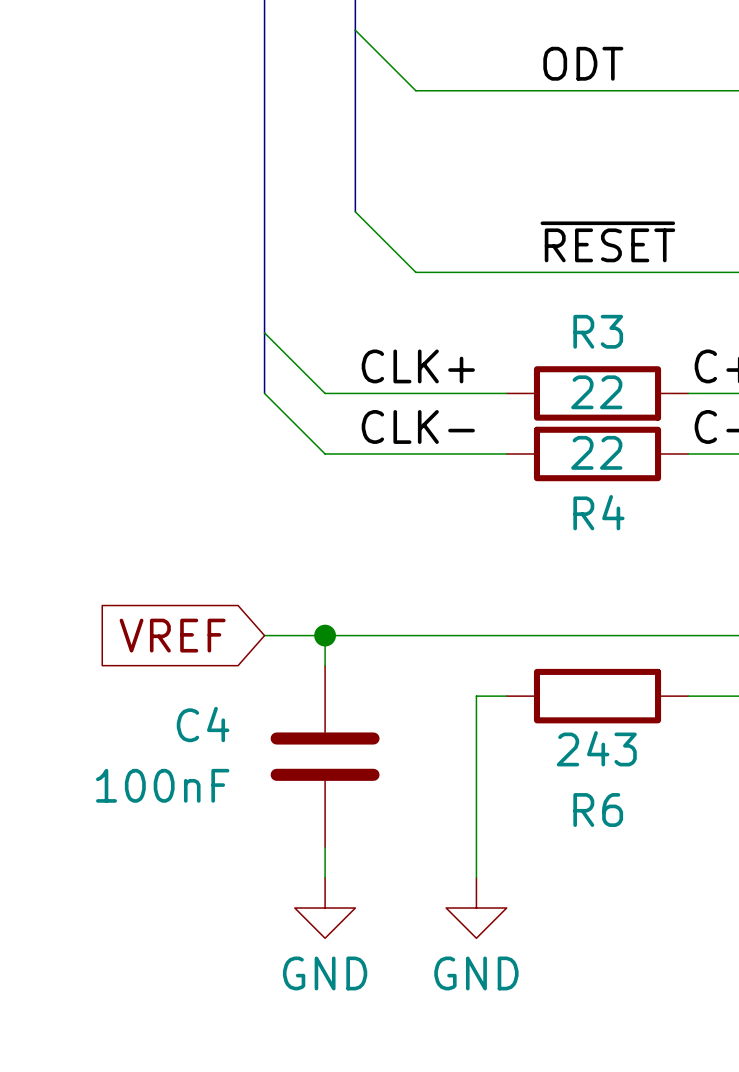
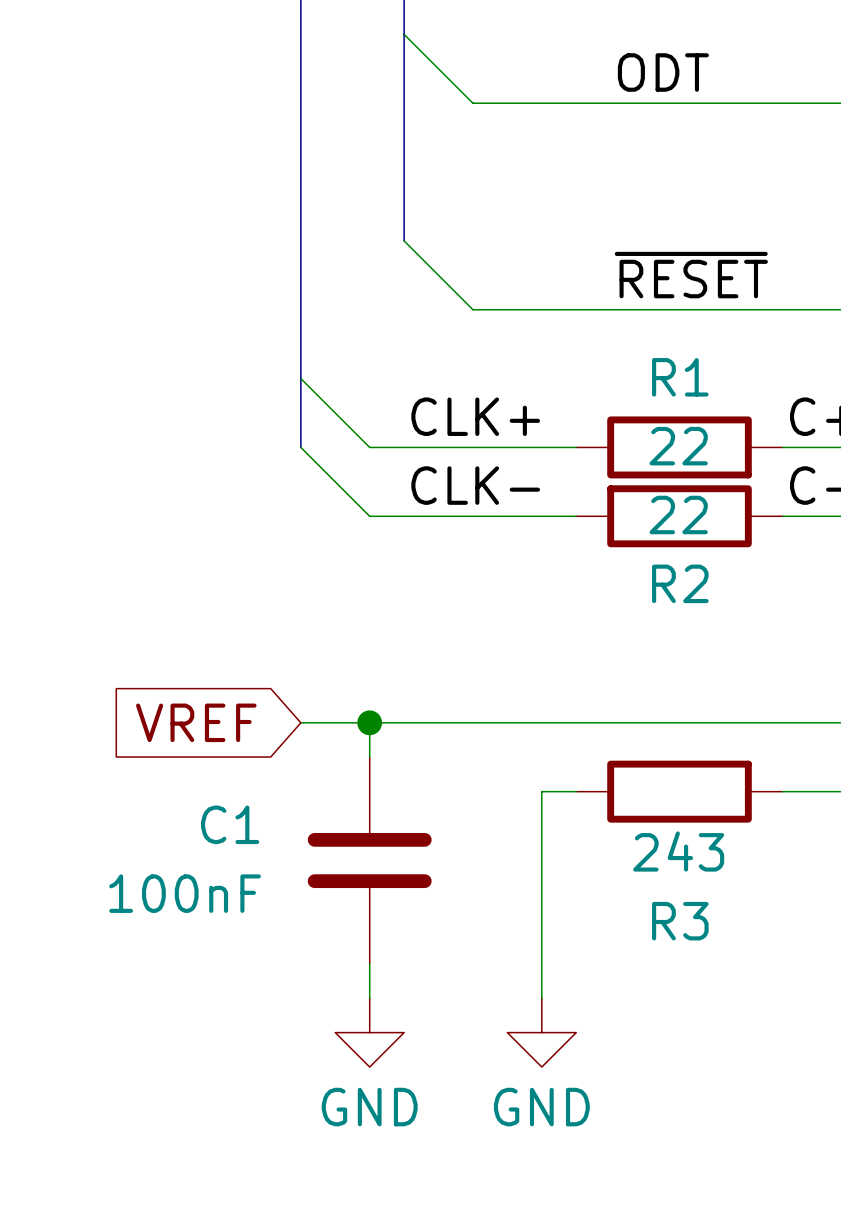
R3 name: R3 (598, 331) -> R1 (680, 377)
R4 name: R4 (598, 512) -> R2 (680, 583)
C4 name: C4 (203, 724) -> C1 (230, 824)
R6 name: R6 (598, 810) -> R3 (680, 921)

